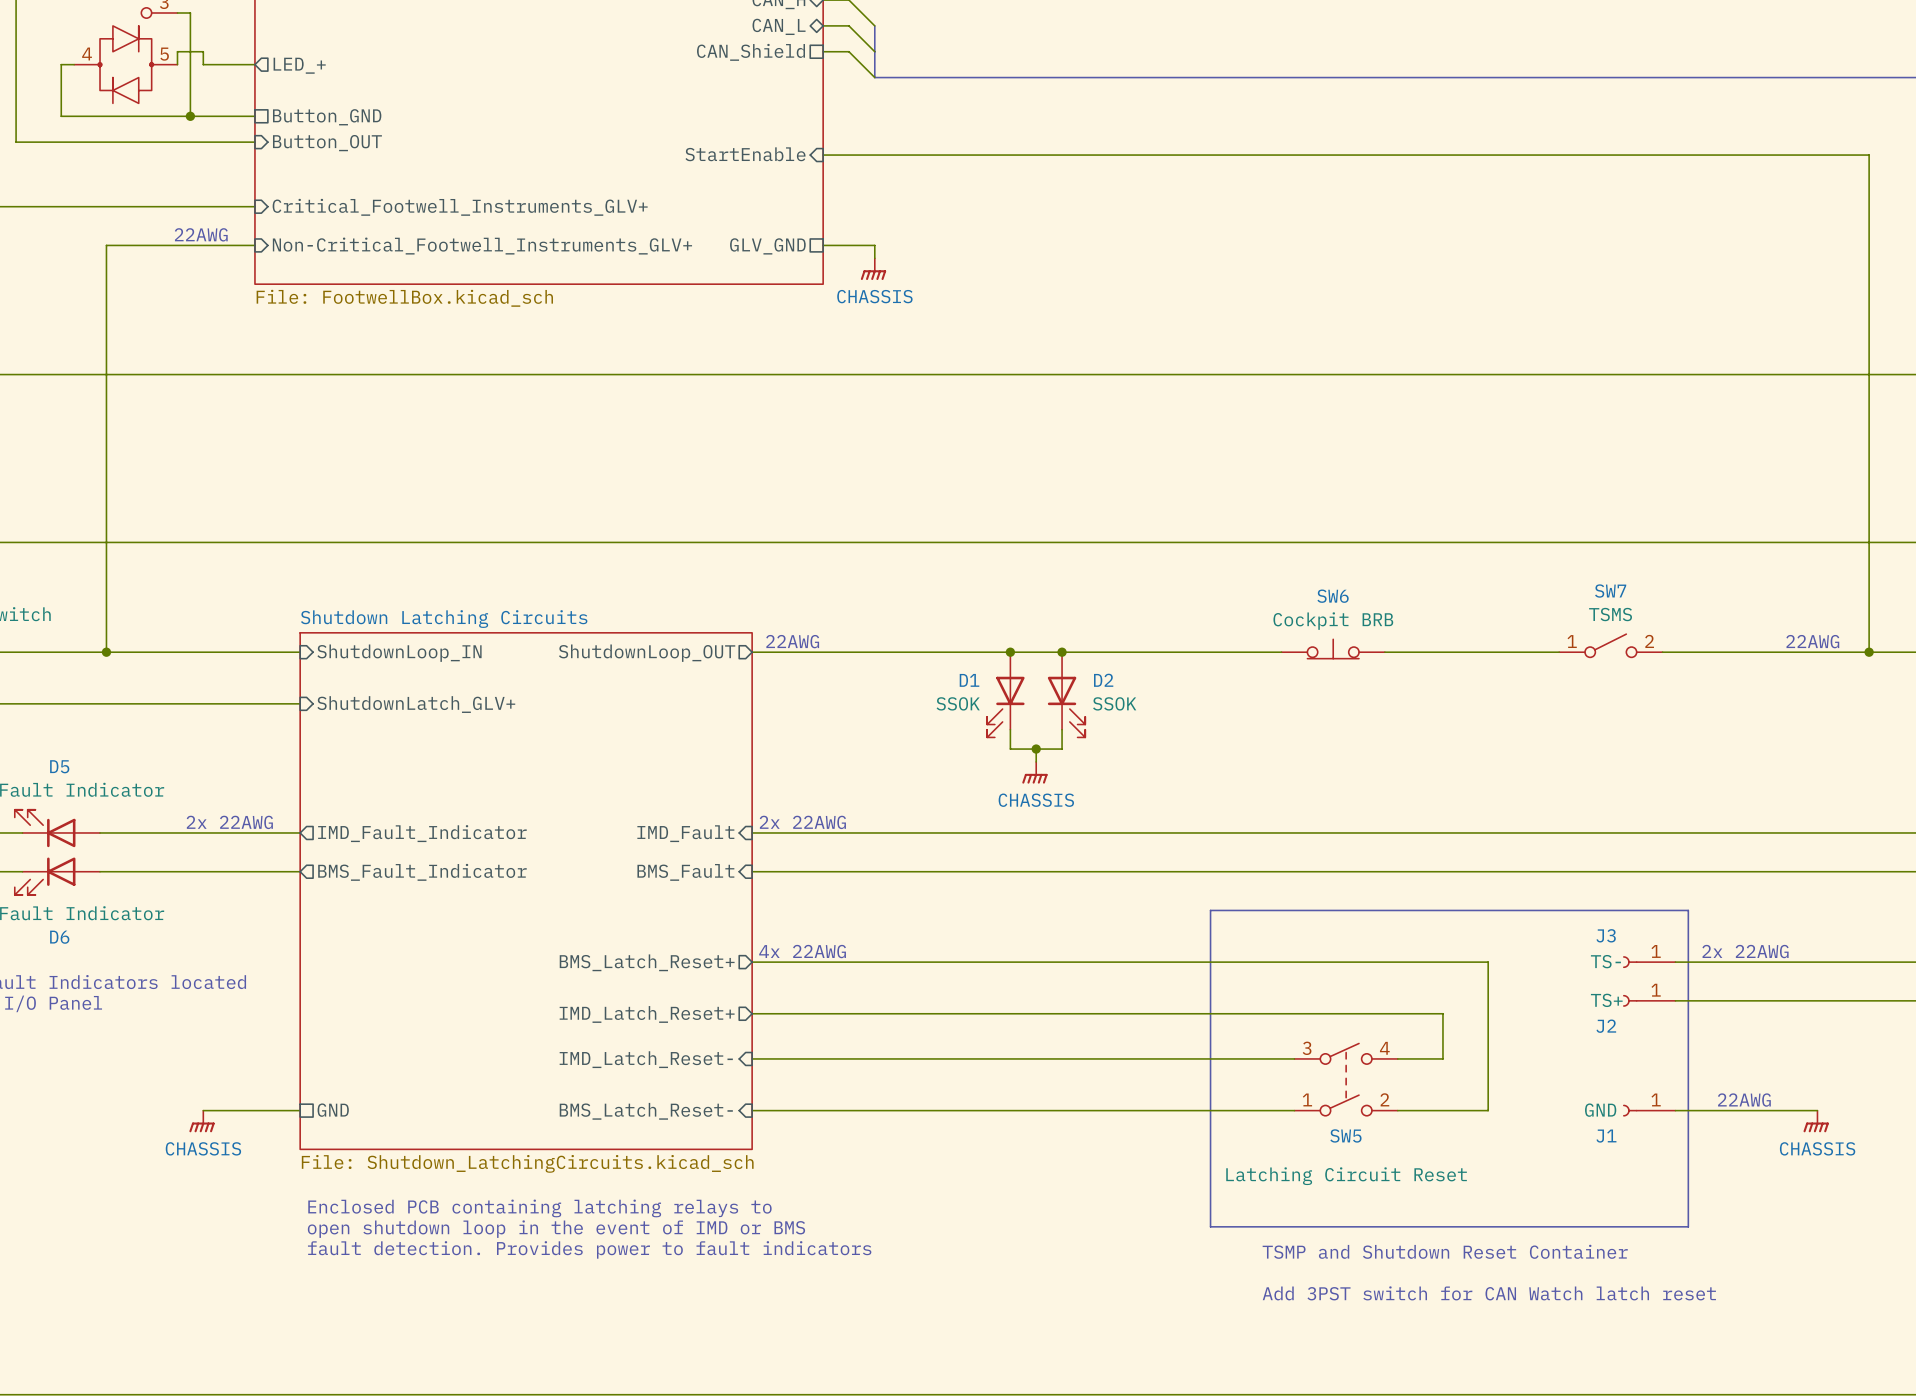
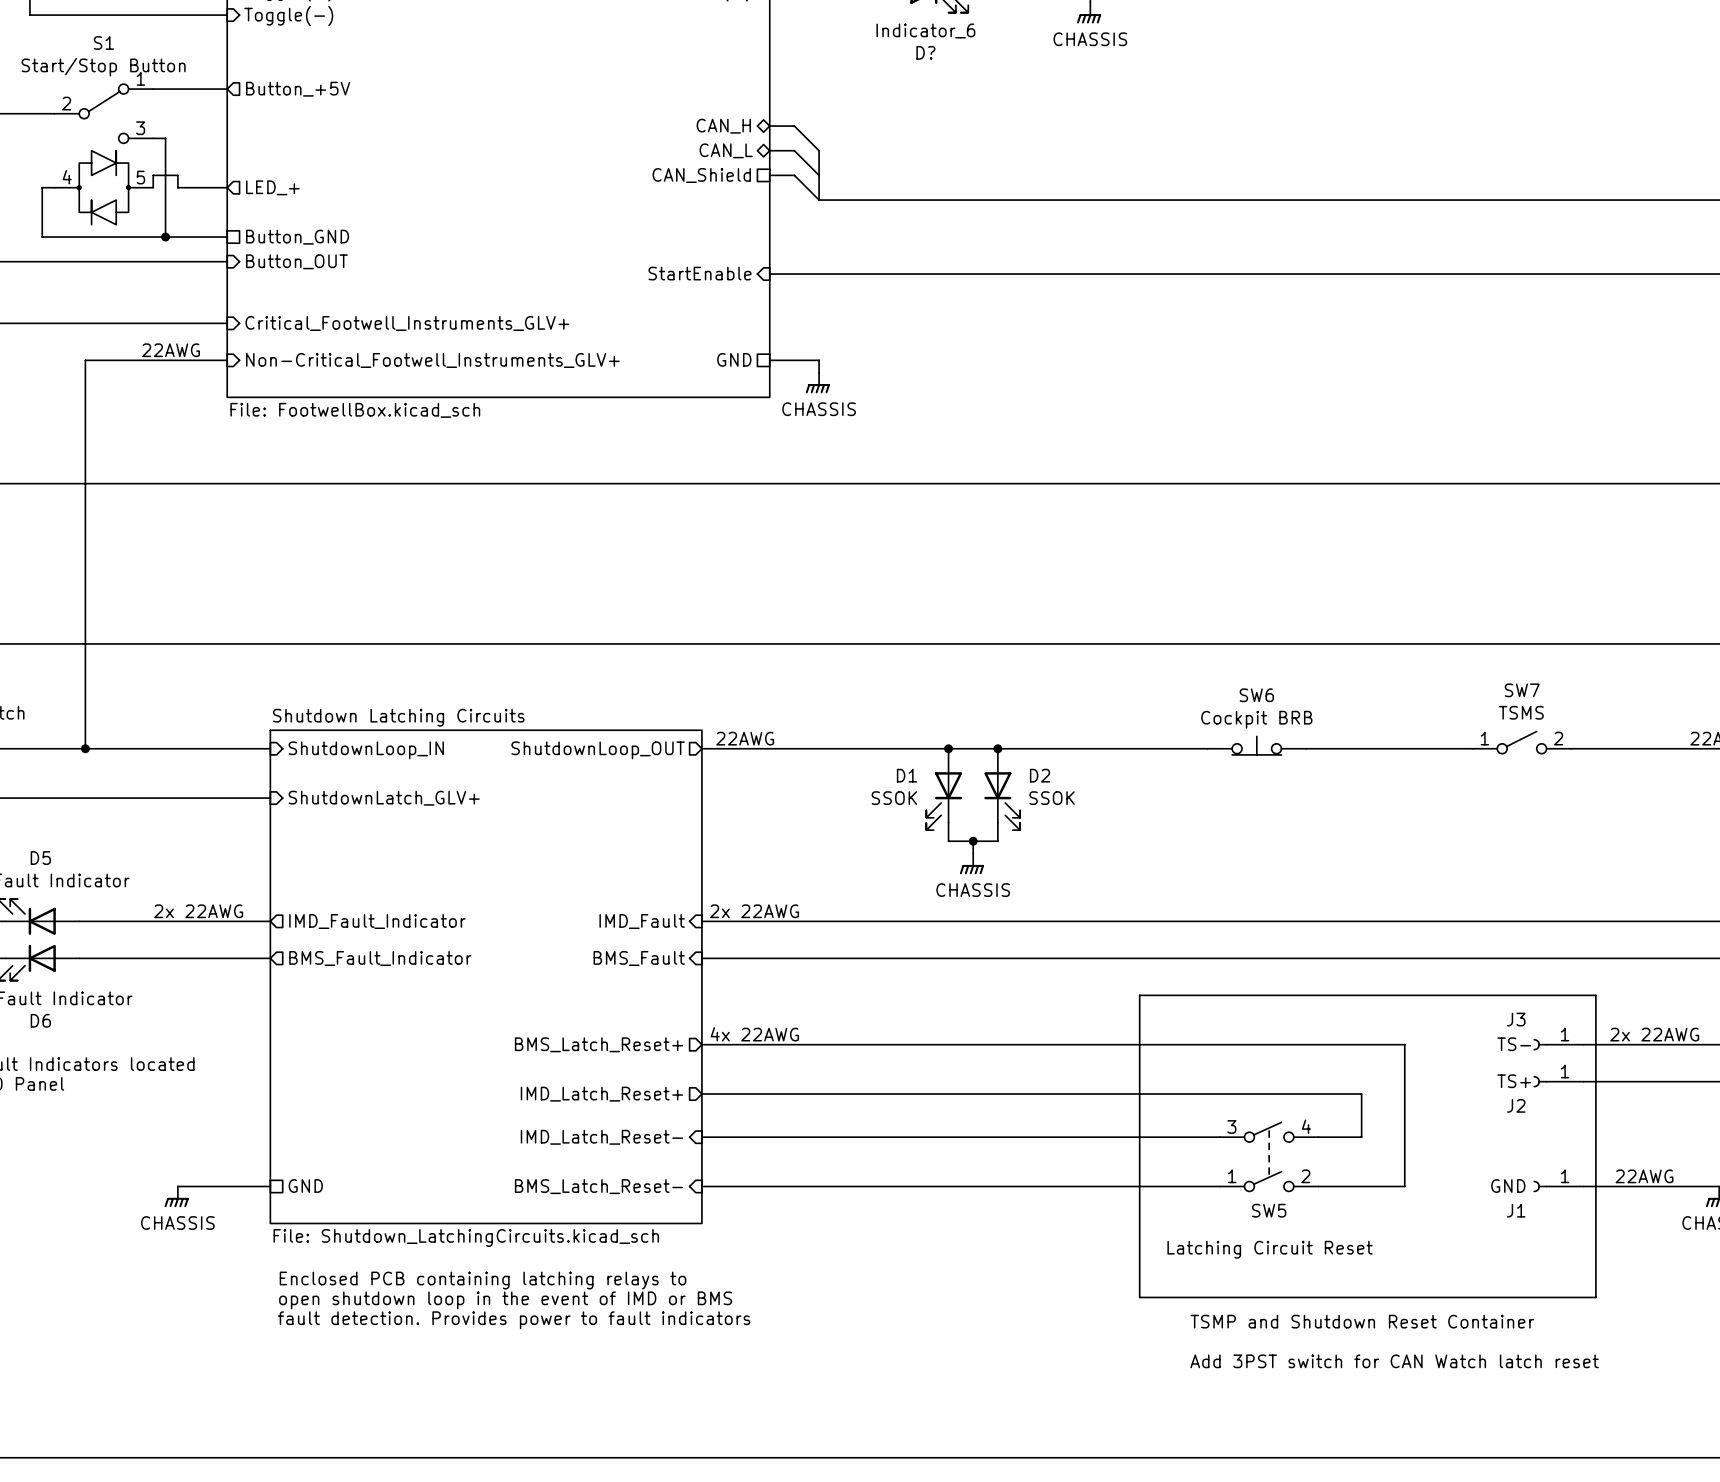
sheet pin: GLV_GND (767, 246) -> GND (734, 359)

